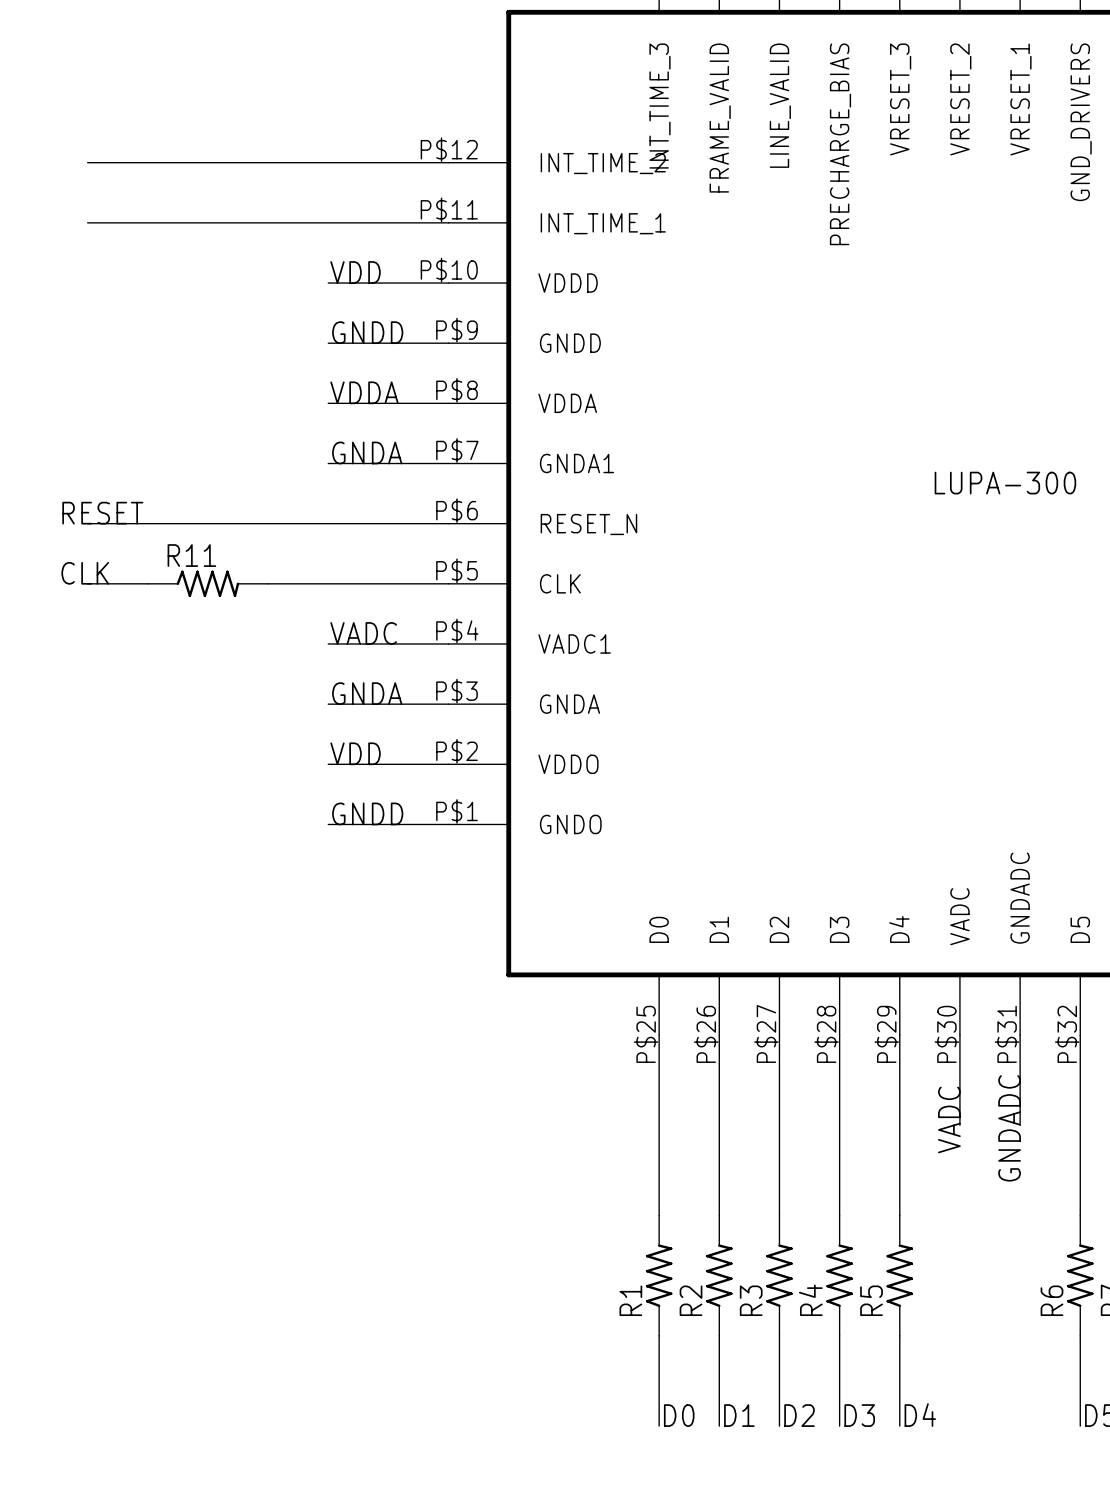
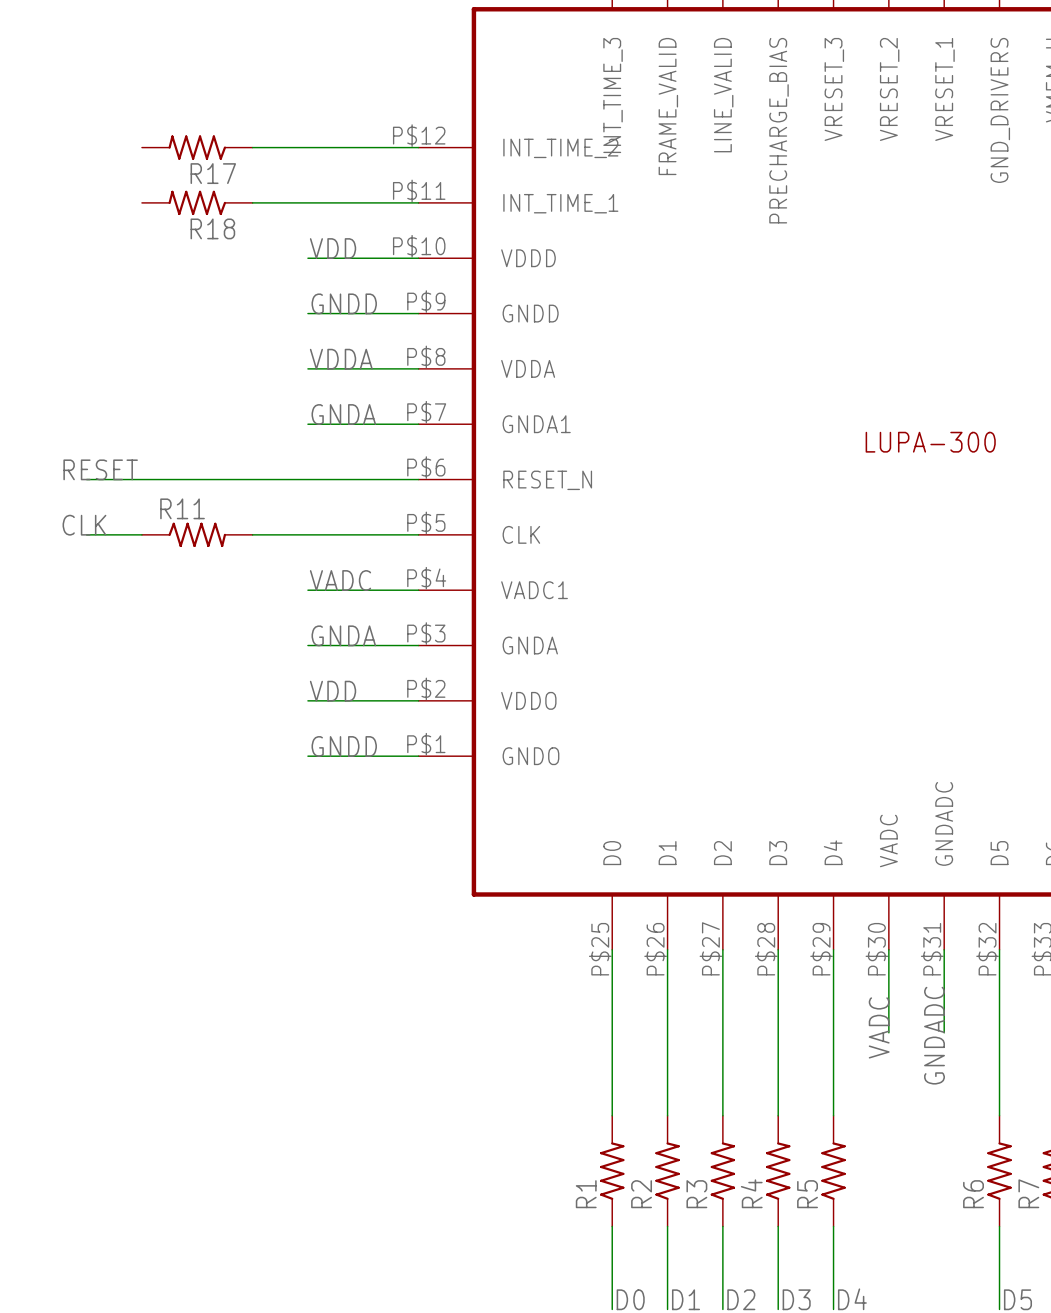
wire: (87, 162) (268, 162) -> none
R17: none -> (197, 147)
wire: (87, 222) (268, 222) -> none
R18: none -> (197, 202)

